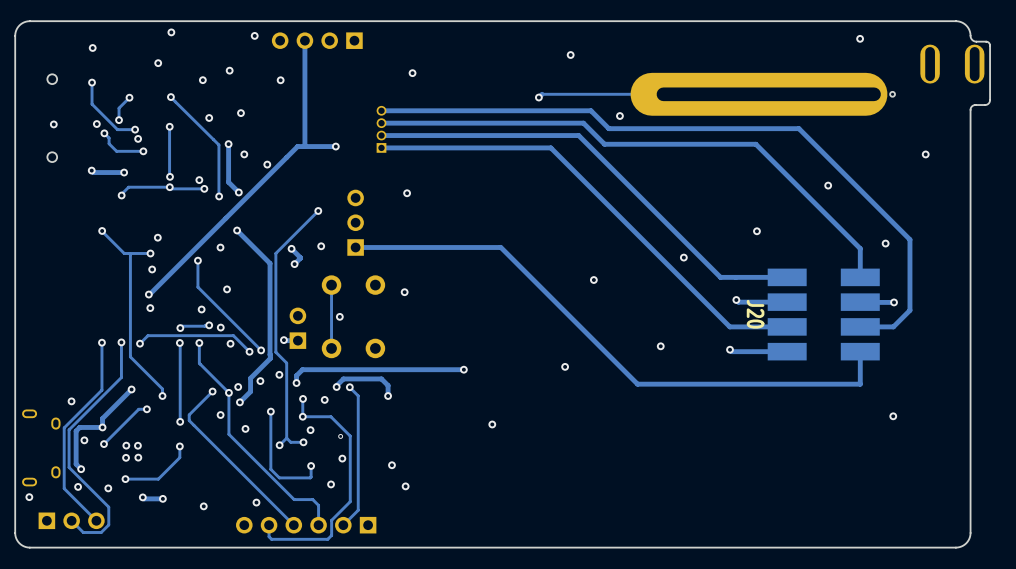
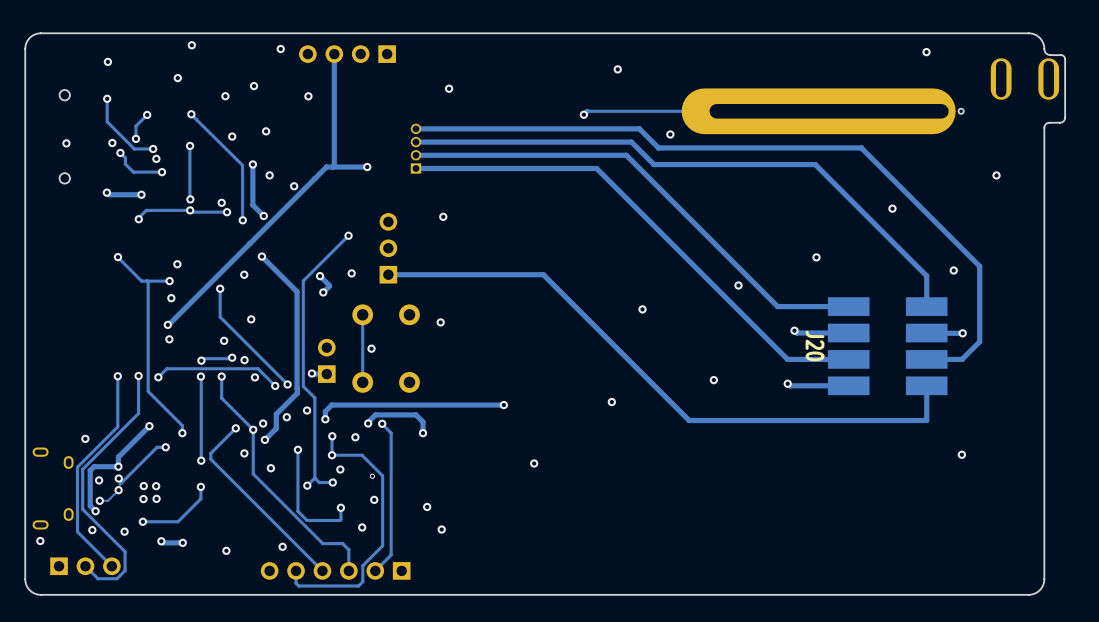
via: none -> (118, 478)
via: (103, 444) -> none
track: none -> (118, 490) (108, 500) (99, 500)
via: none -> (118, 490)
via: none -> (99, 500)

